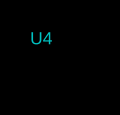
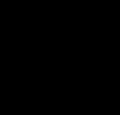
U4: (41, 38) -> none

